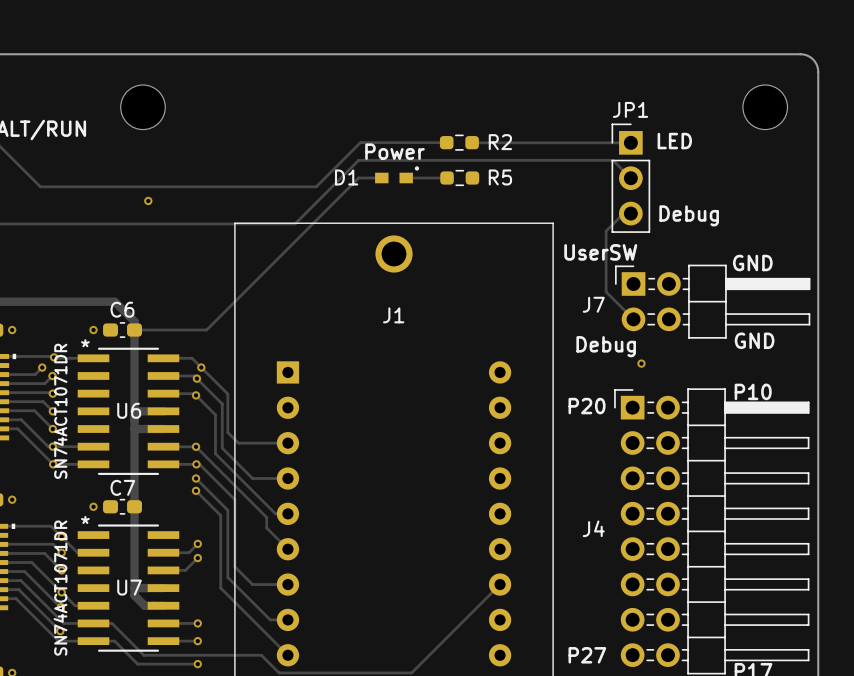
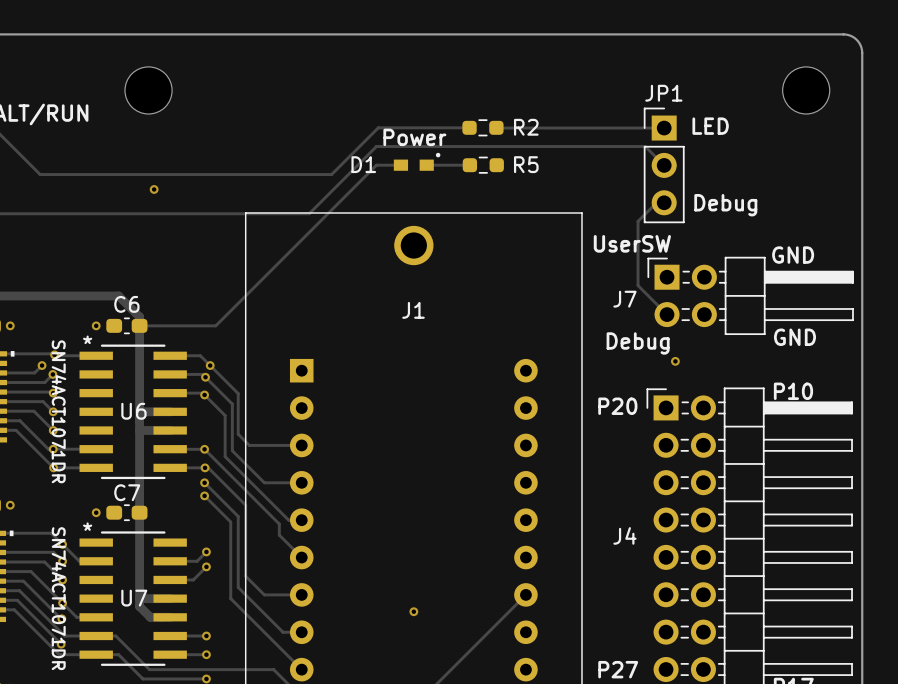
text rotation: 0° (60, 411) -> 180° (58, 411)
text rotation: 0° (60, 588) -> 180° (58, 598)
via: none -> (413, 611)

